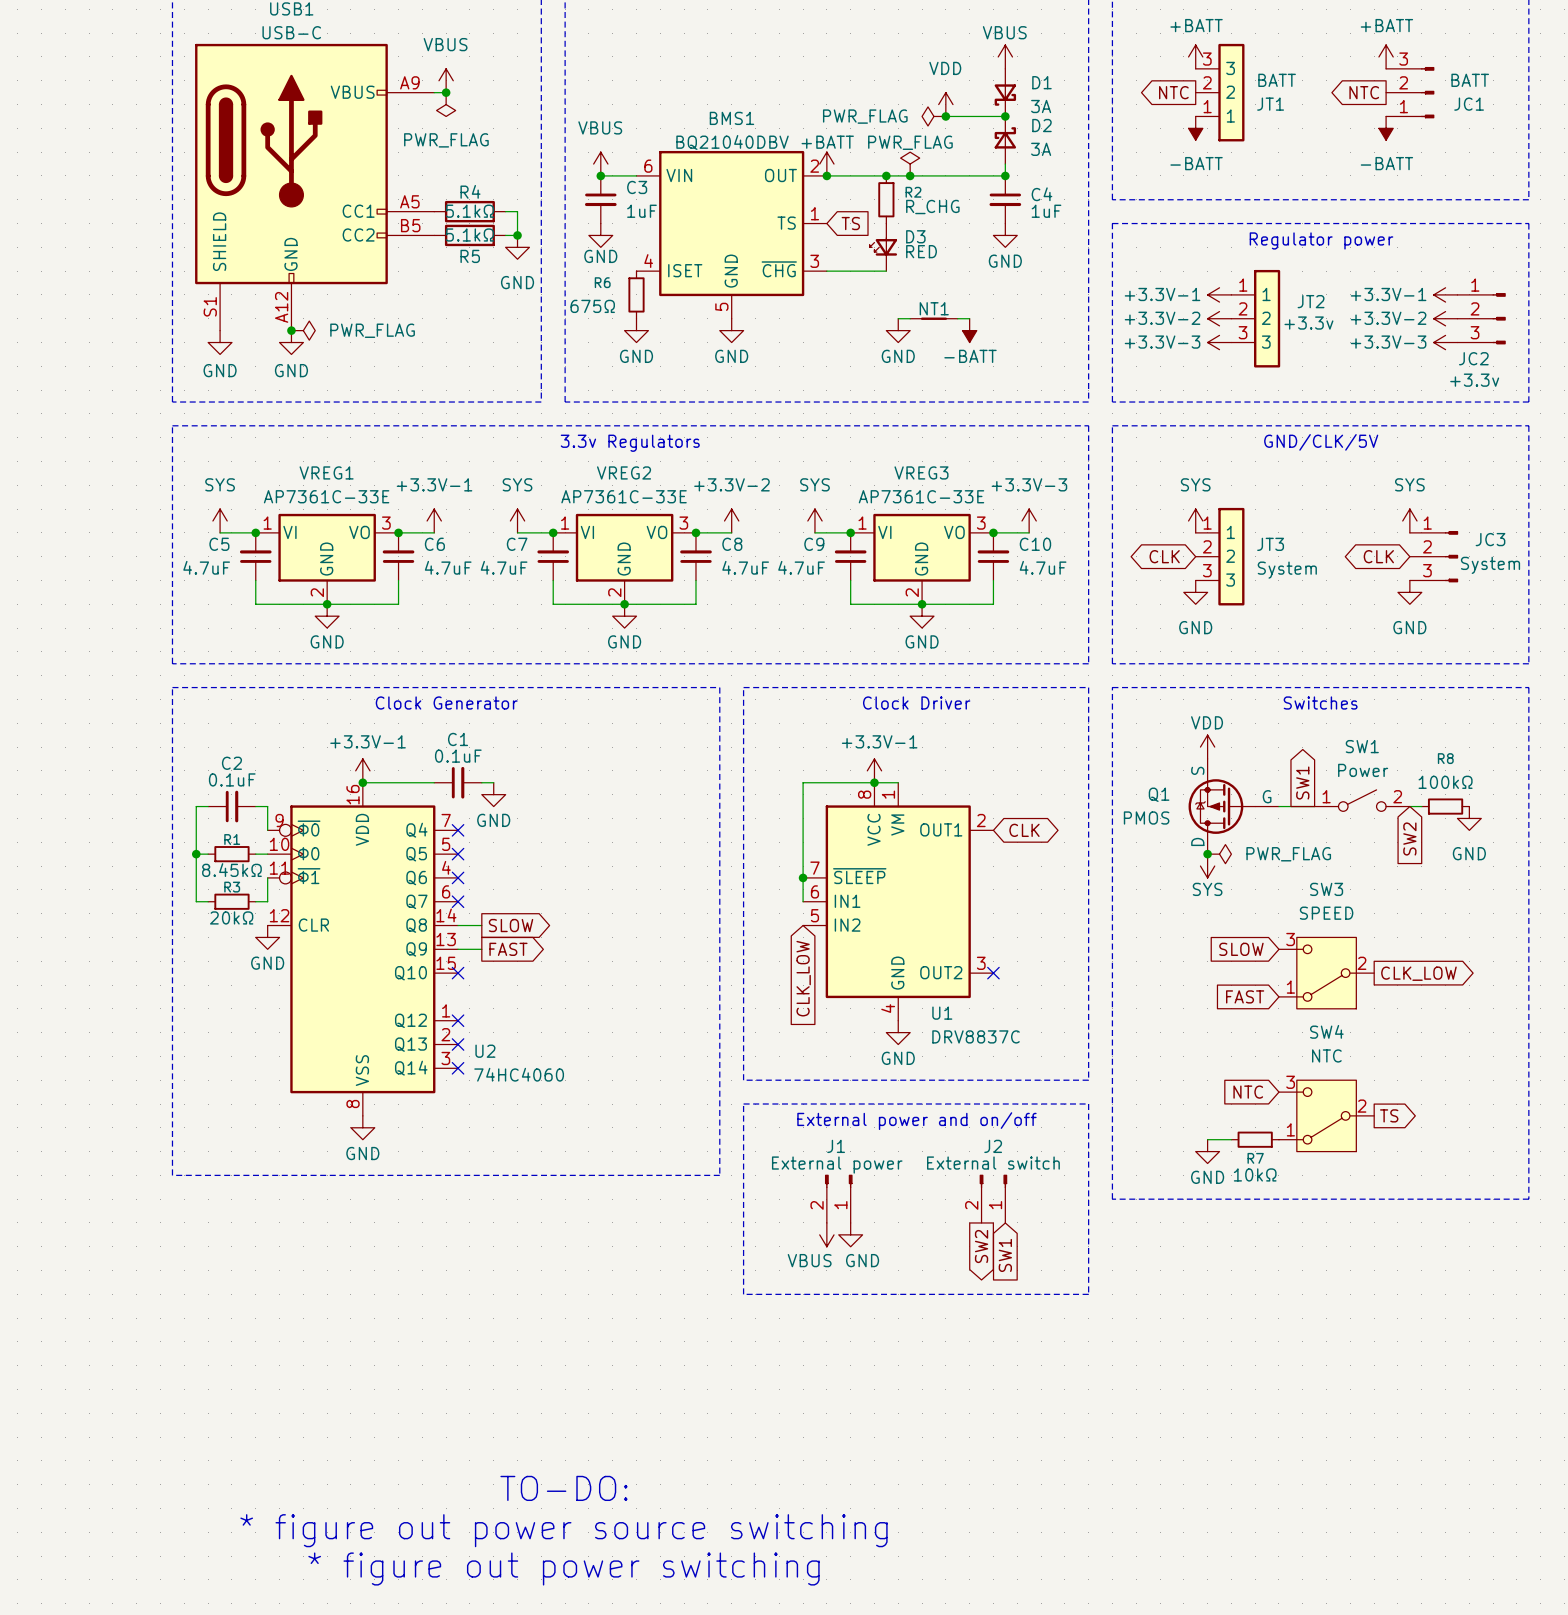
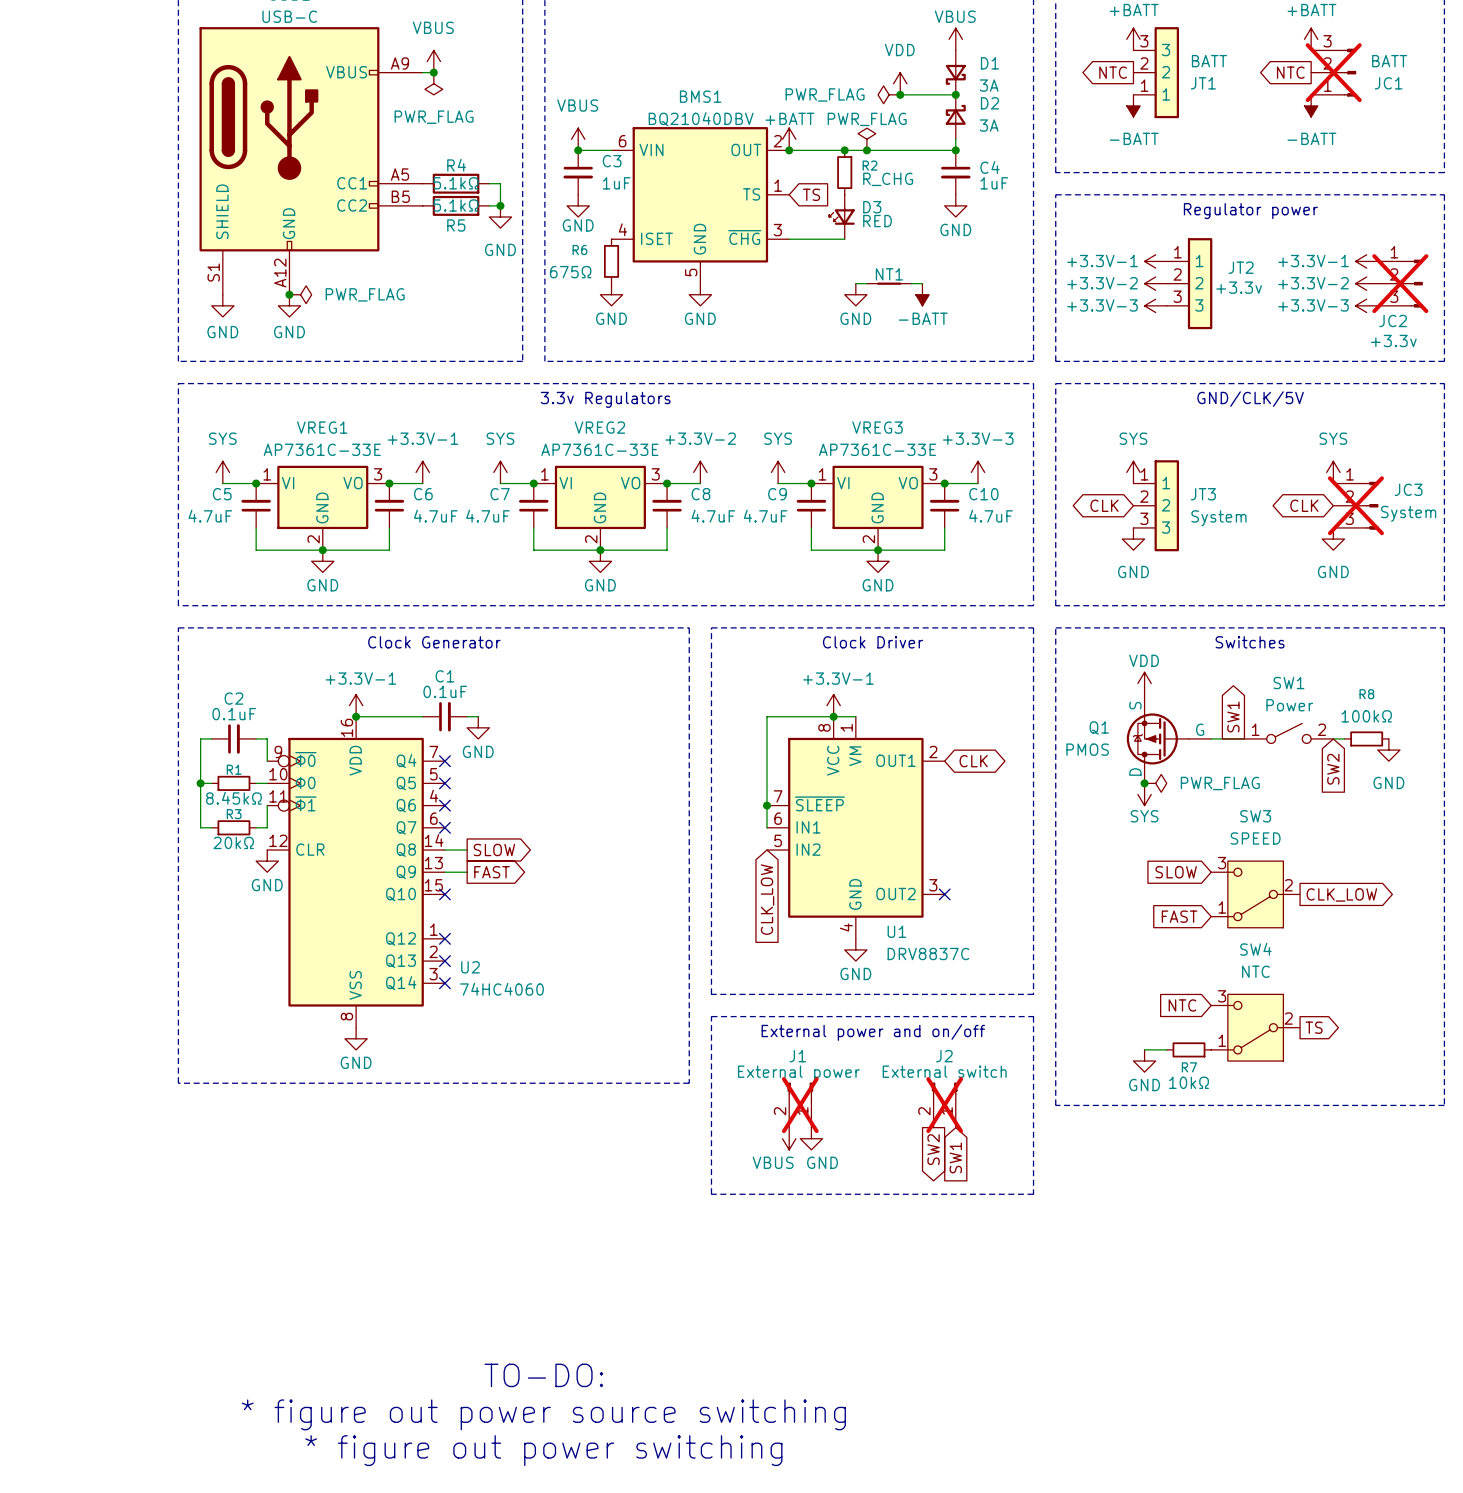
JC1 do-not-place cross: none -> (1333, 72)
JC2 do-not-place cross: none -> (1400, 283)
JC3 do-not-place cross: none -> (1355, 505)
J1 do-not-place cross: none -> (800, 1105)
J2 do-not-place cross: none -> (944, 1105)

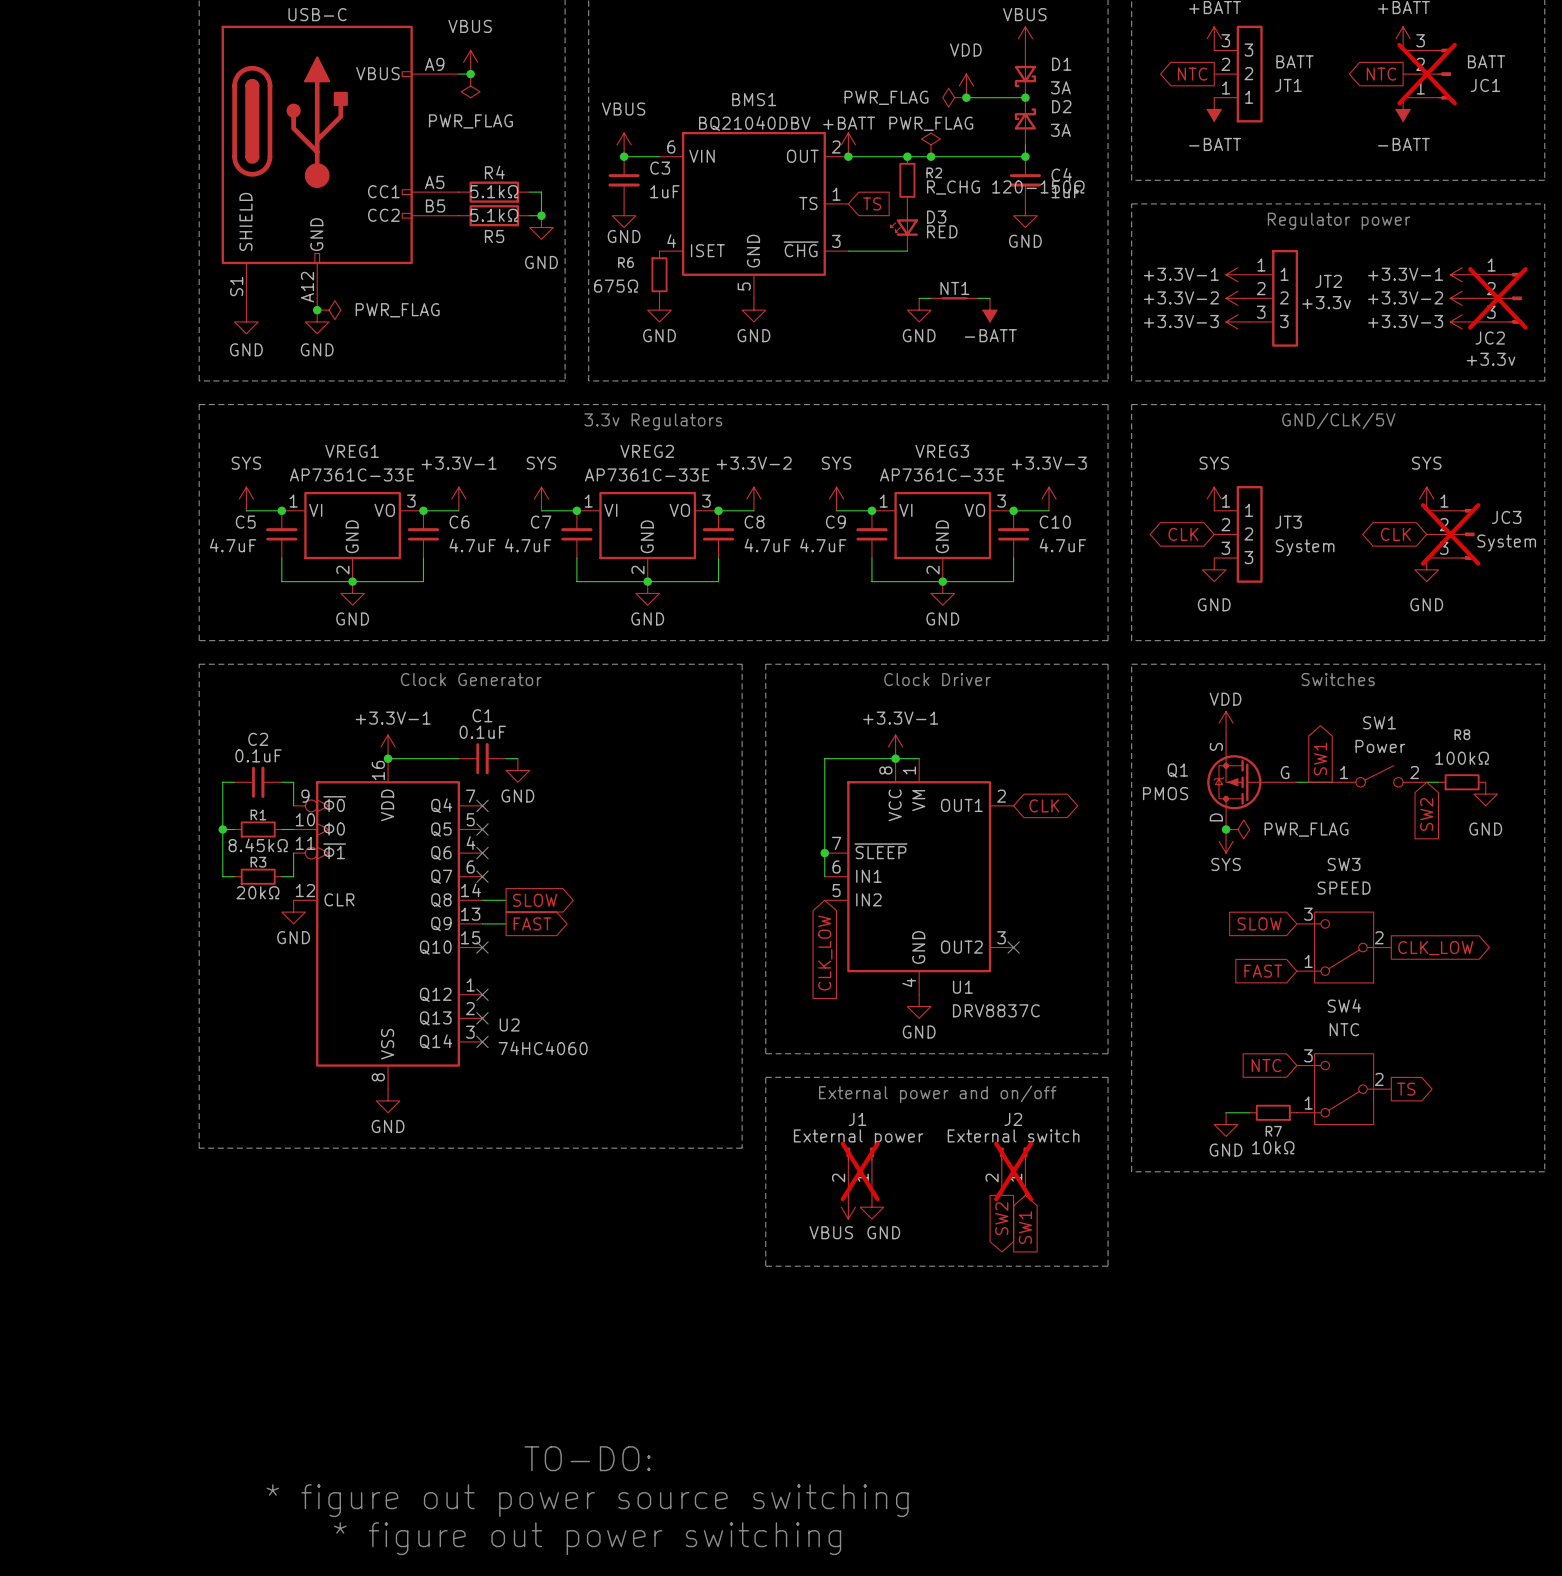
R2 value: R_CHG (888, 179) -> R_CHG 120-150Ω (1005, 187)

